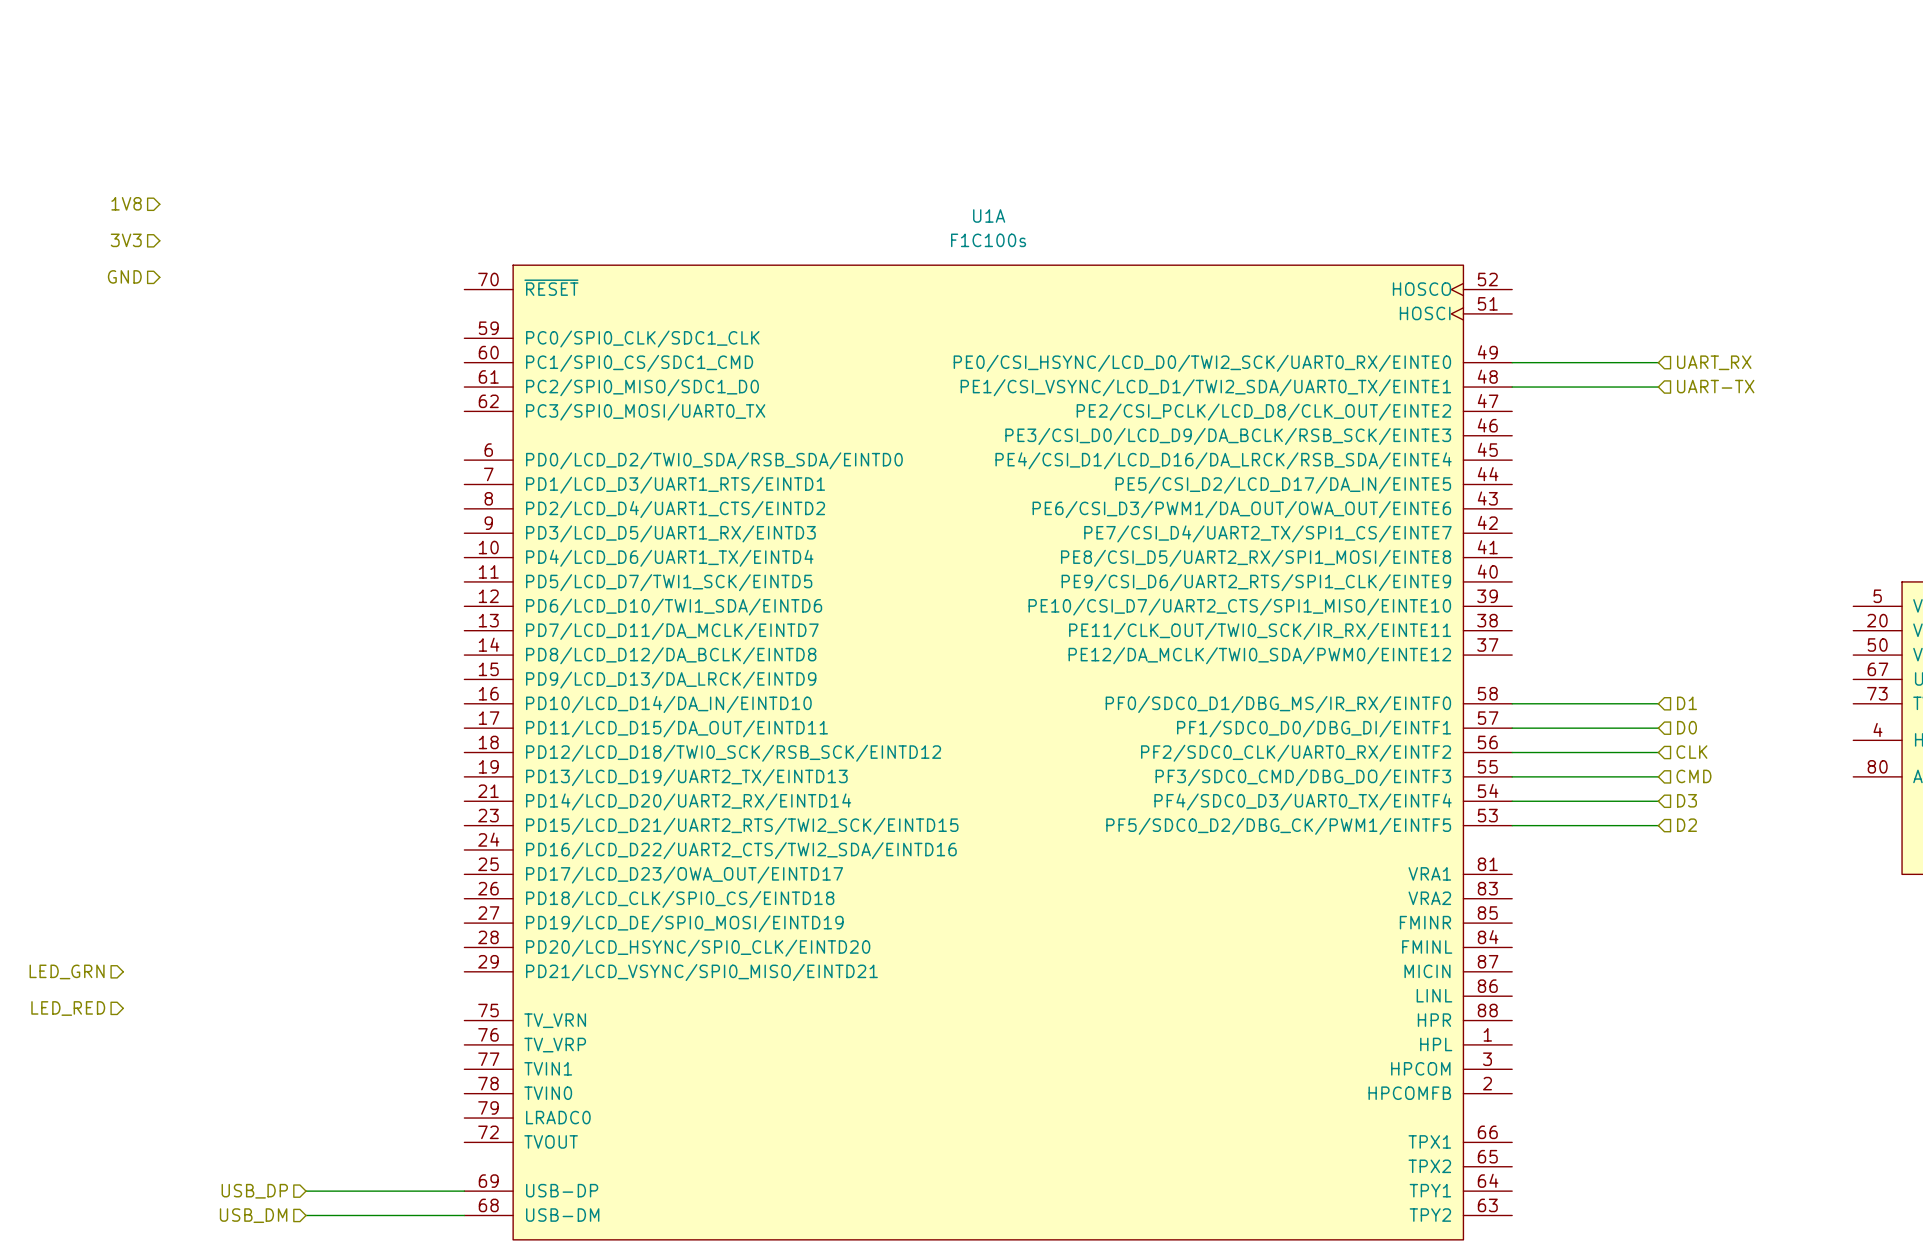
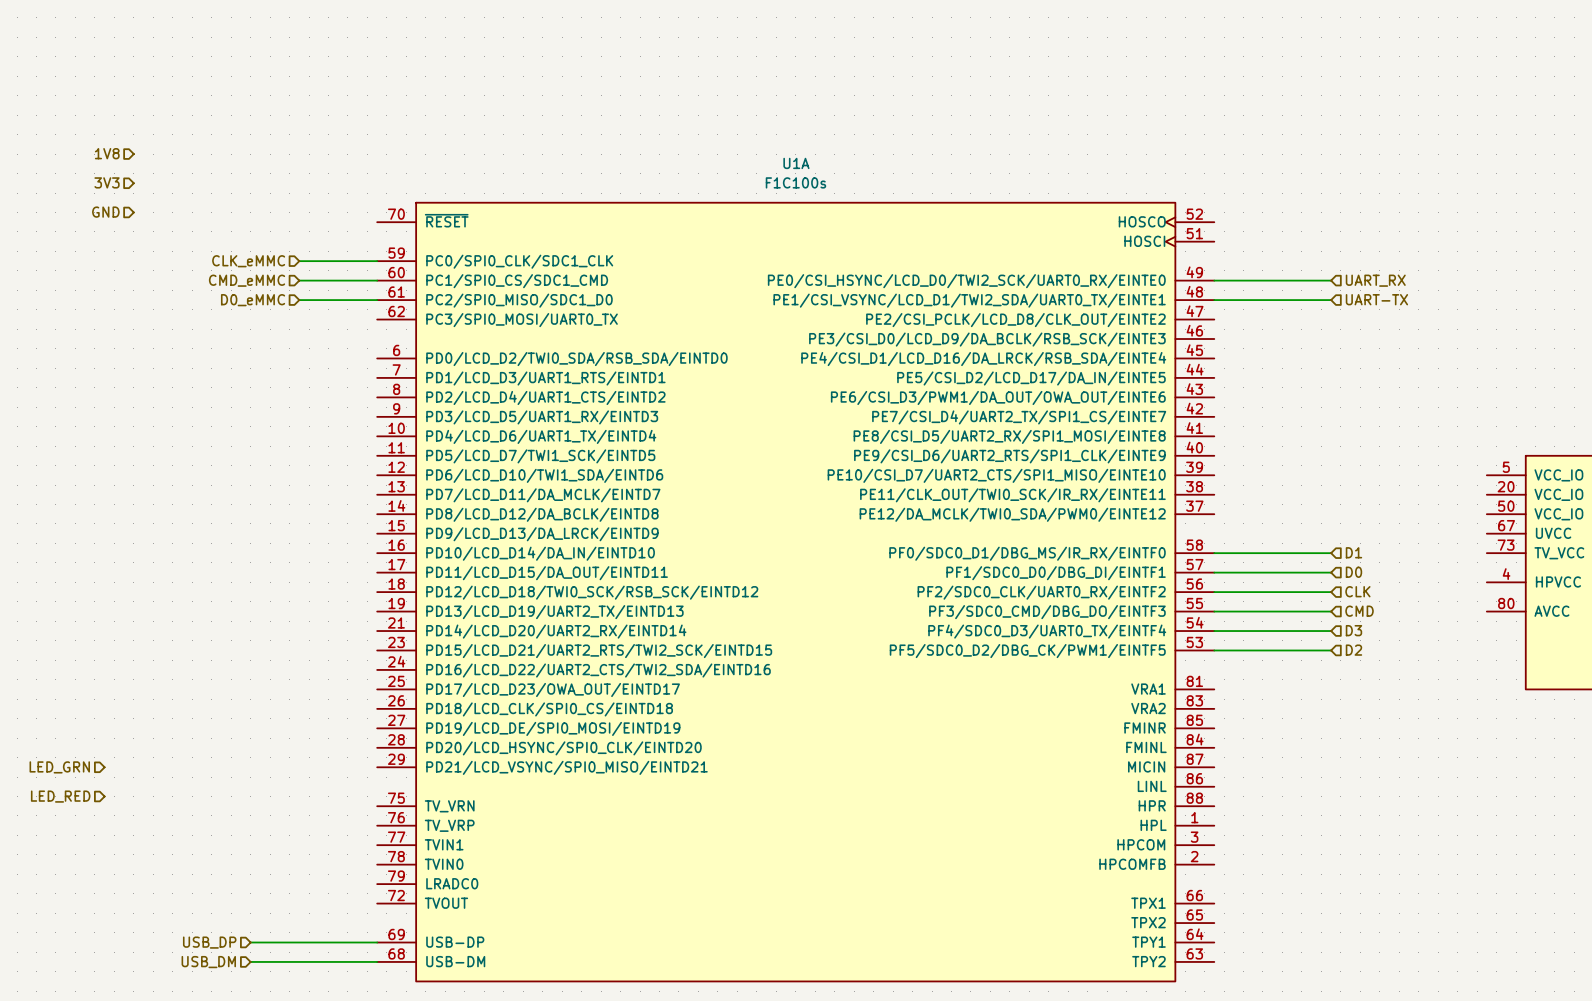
hierarchical label: none -> CLK_eMMC (248, 261)
wire: none -> (299, 261) (377, 261)
hierarchical label: none -> CMD_eMMC (247, 280)
wire: none -> (299, 280) (377, 280)
hierarchical label: none -> D0_eMMC (253, 300)
wire: none -> (299, 300) (377, 300)

